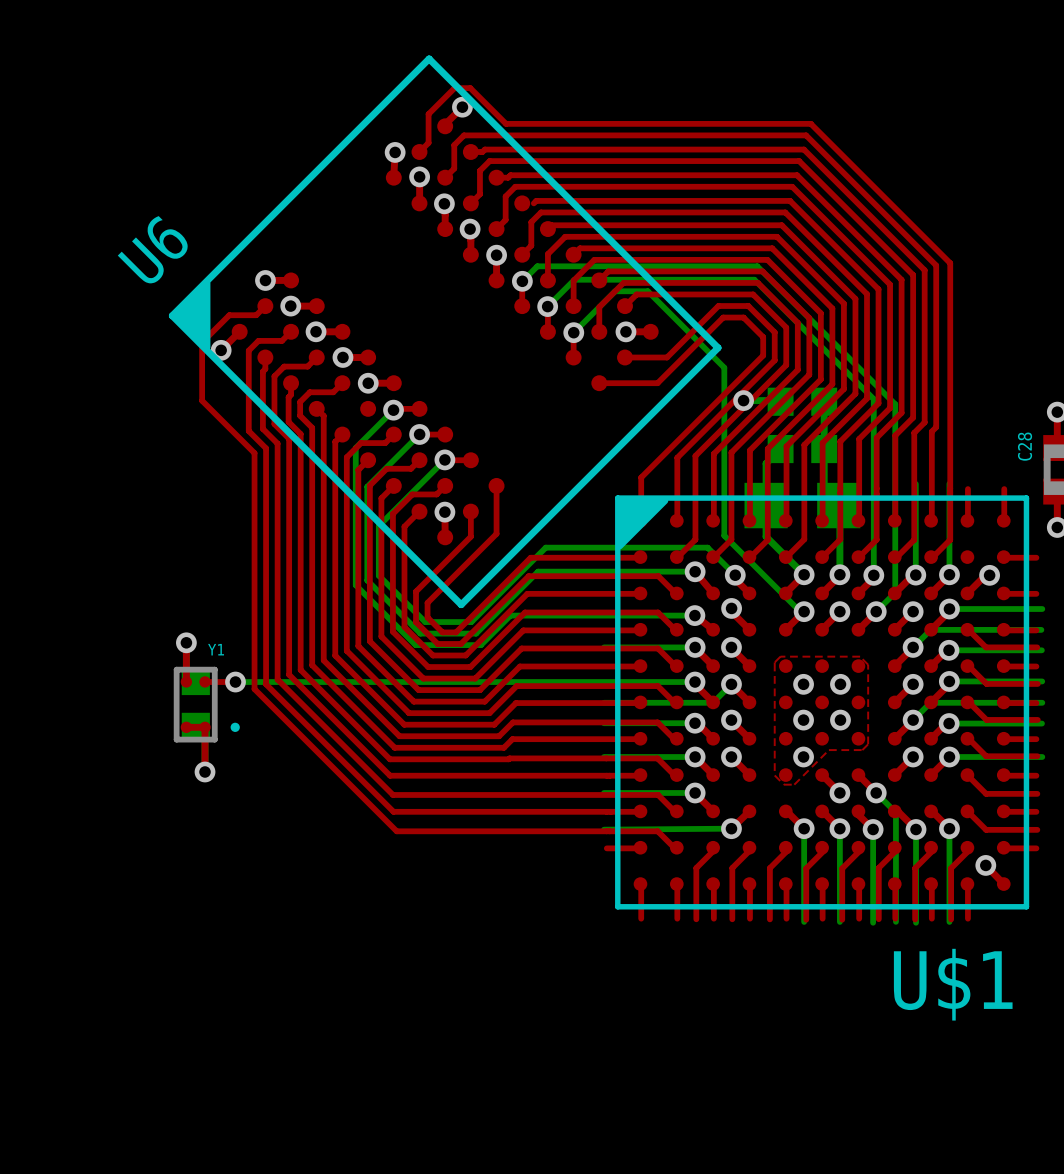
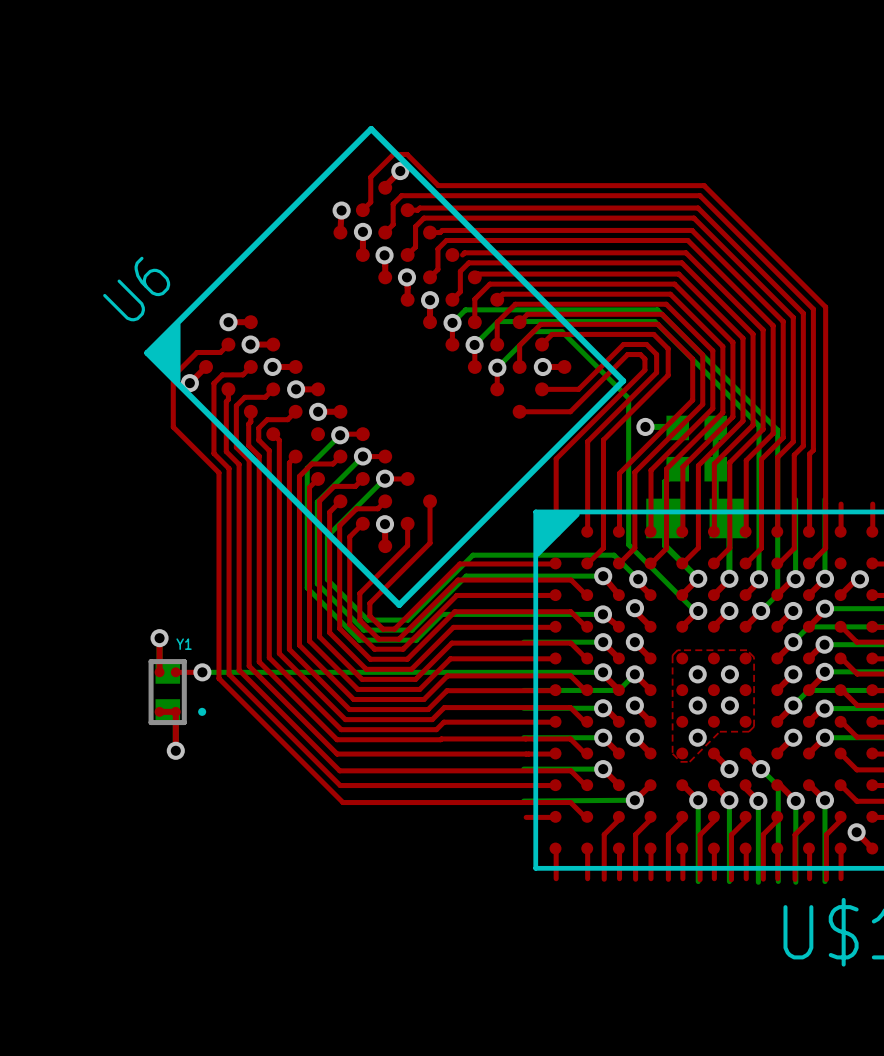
top track: (744, 306) (748, 306) (774, 332) (774, 360) (677, 457) -> (646, 344) (656, 354) (656, 372) (587, 441) (587, 476)
top track: (769, 311) (786, 327) (786, 365) (695, 455) -> (668, 348) (668, 375) (603, 439) (603, 475)
top track: (737, 317) (743, 317) (763, 337) (763, 355) (641, 477) -> (640, 354) (644, 359) (644, 370) (556, 458) (556, 494)

